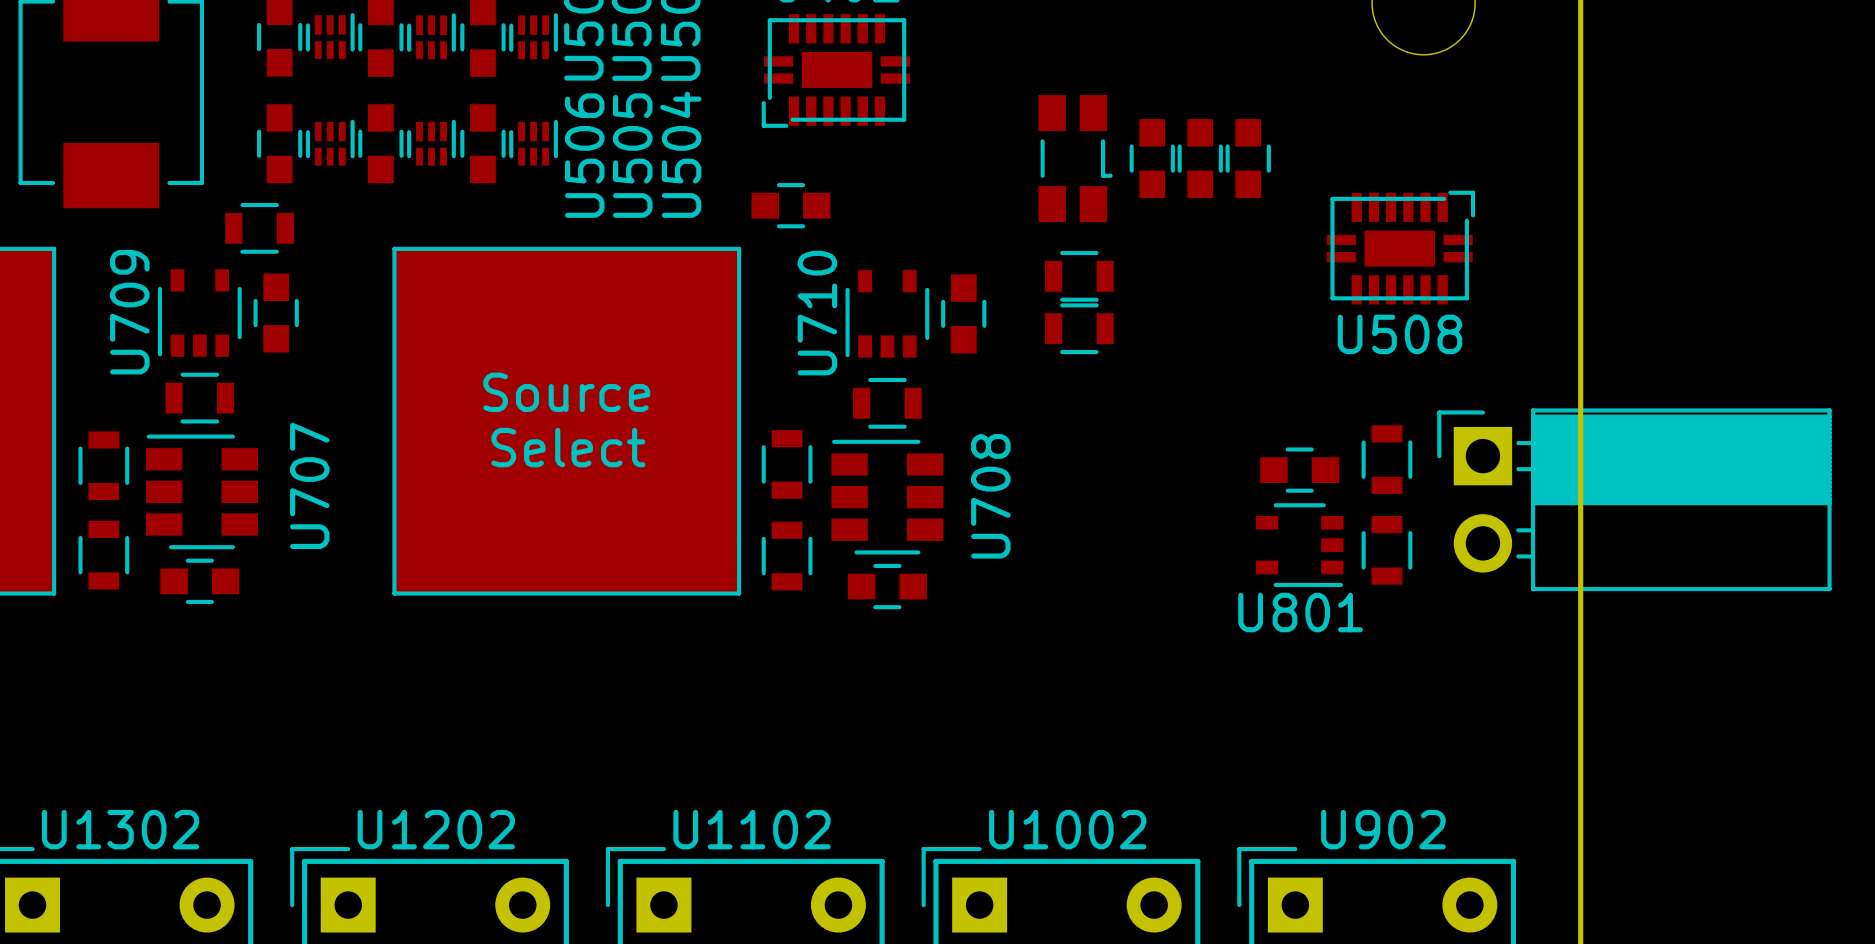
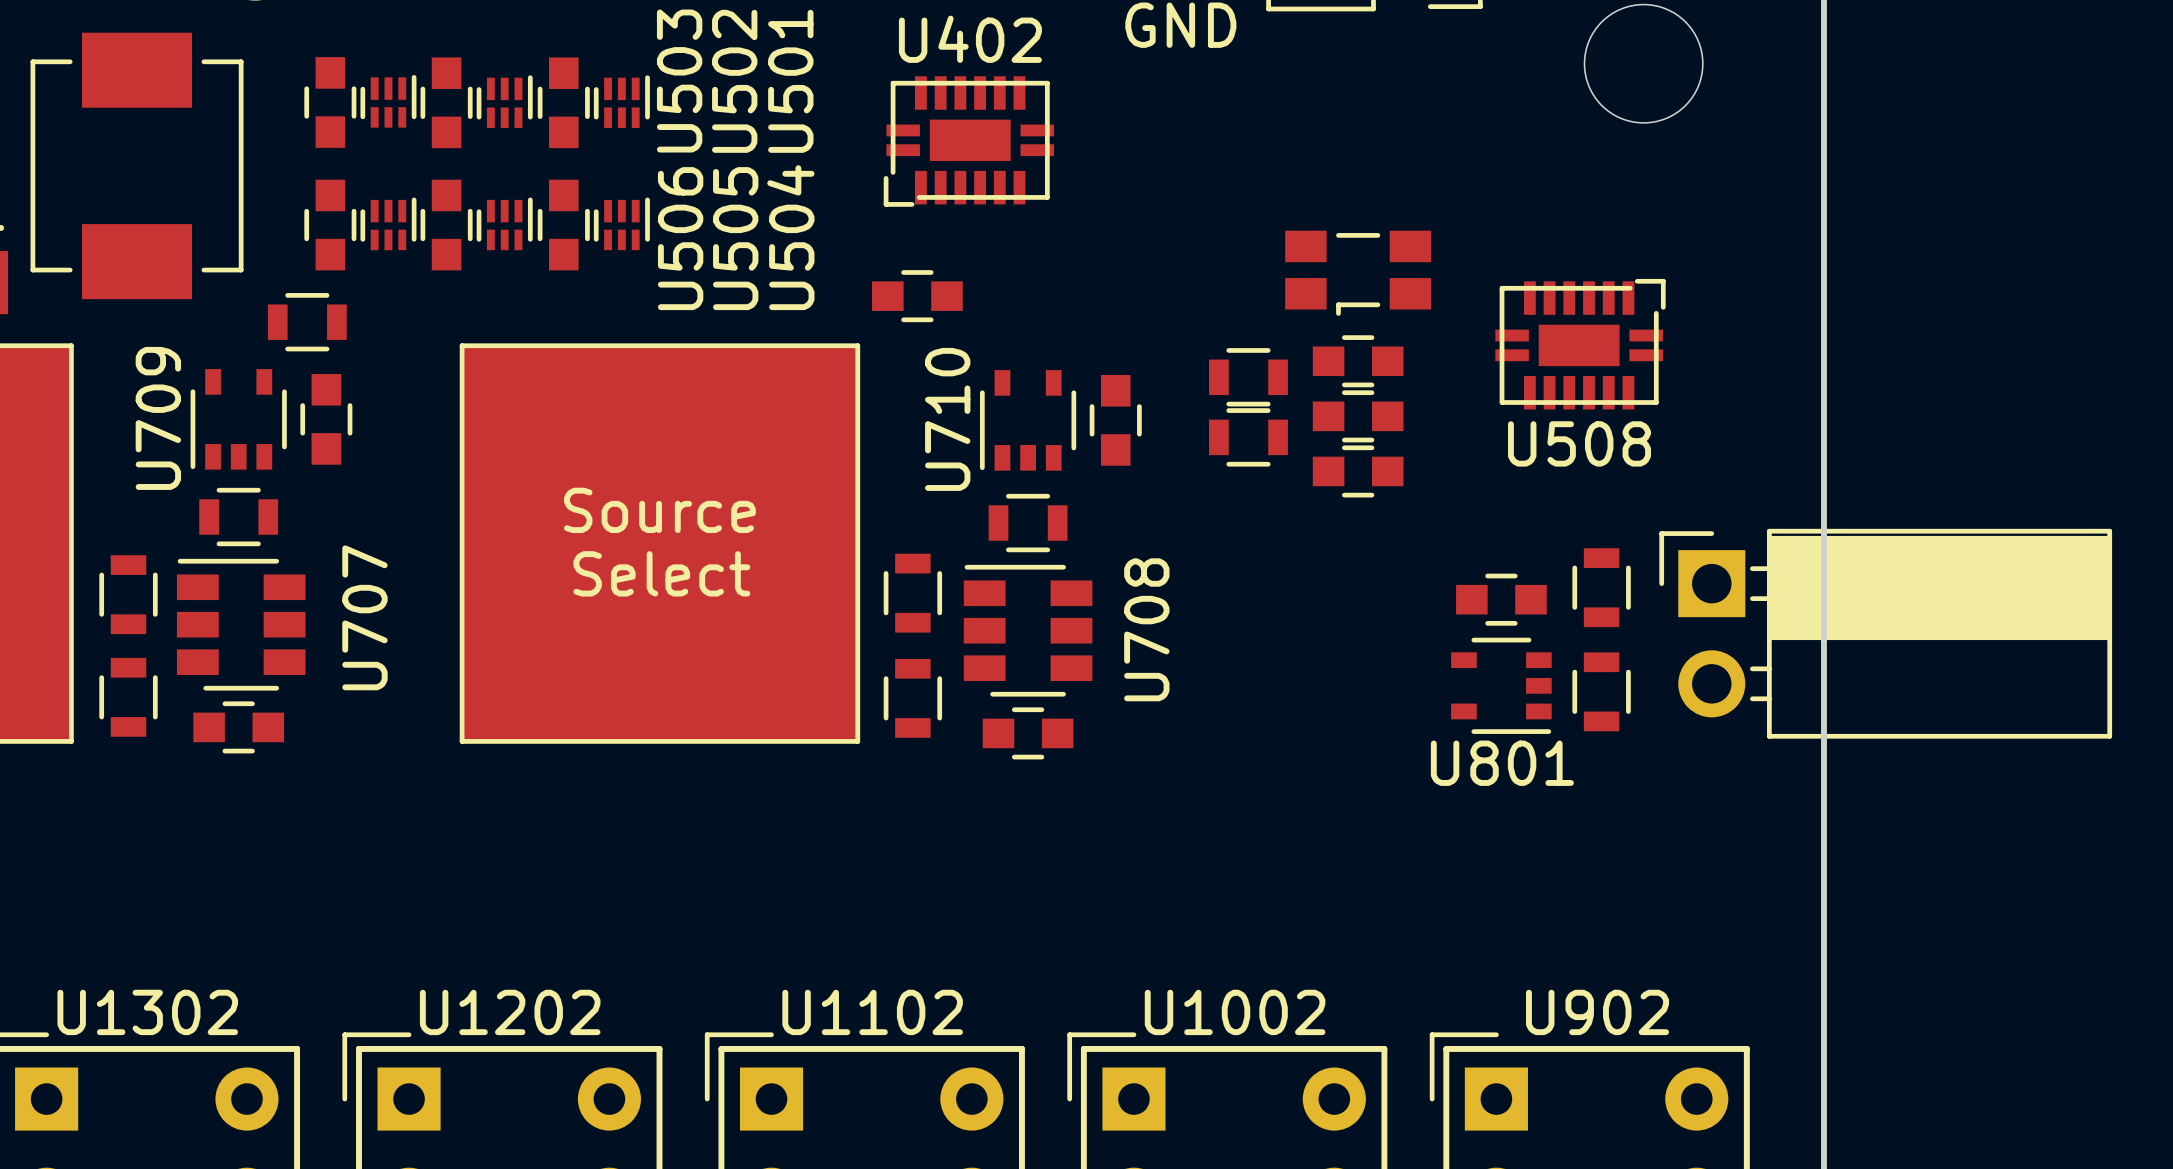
part rotation: 0° (1075, 158) -> 90° clockwise (1358, 273)
part position: (1075, 158) -> (1358, 273)
part: (1152, 158) -> none
part: (1200, 158) -> none
part: (1248, 158) -> none
U508 position: (1400, 247) -> (1580, 344)
part: none -> (1358, 361)
part: none -> (1358, 416)
part: none -> (1358, 471)

